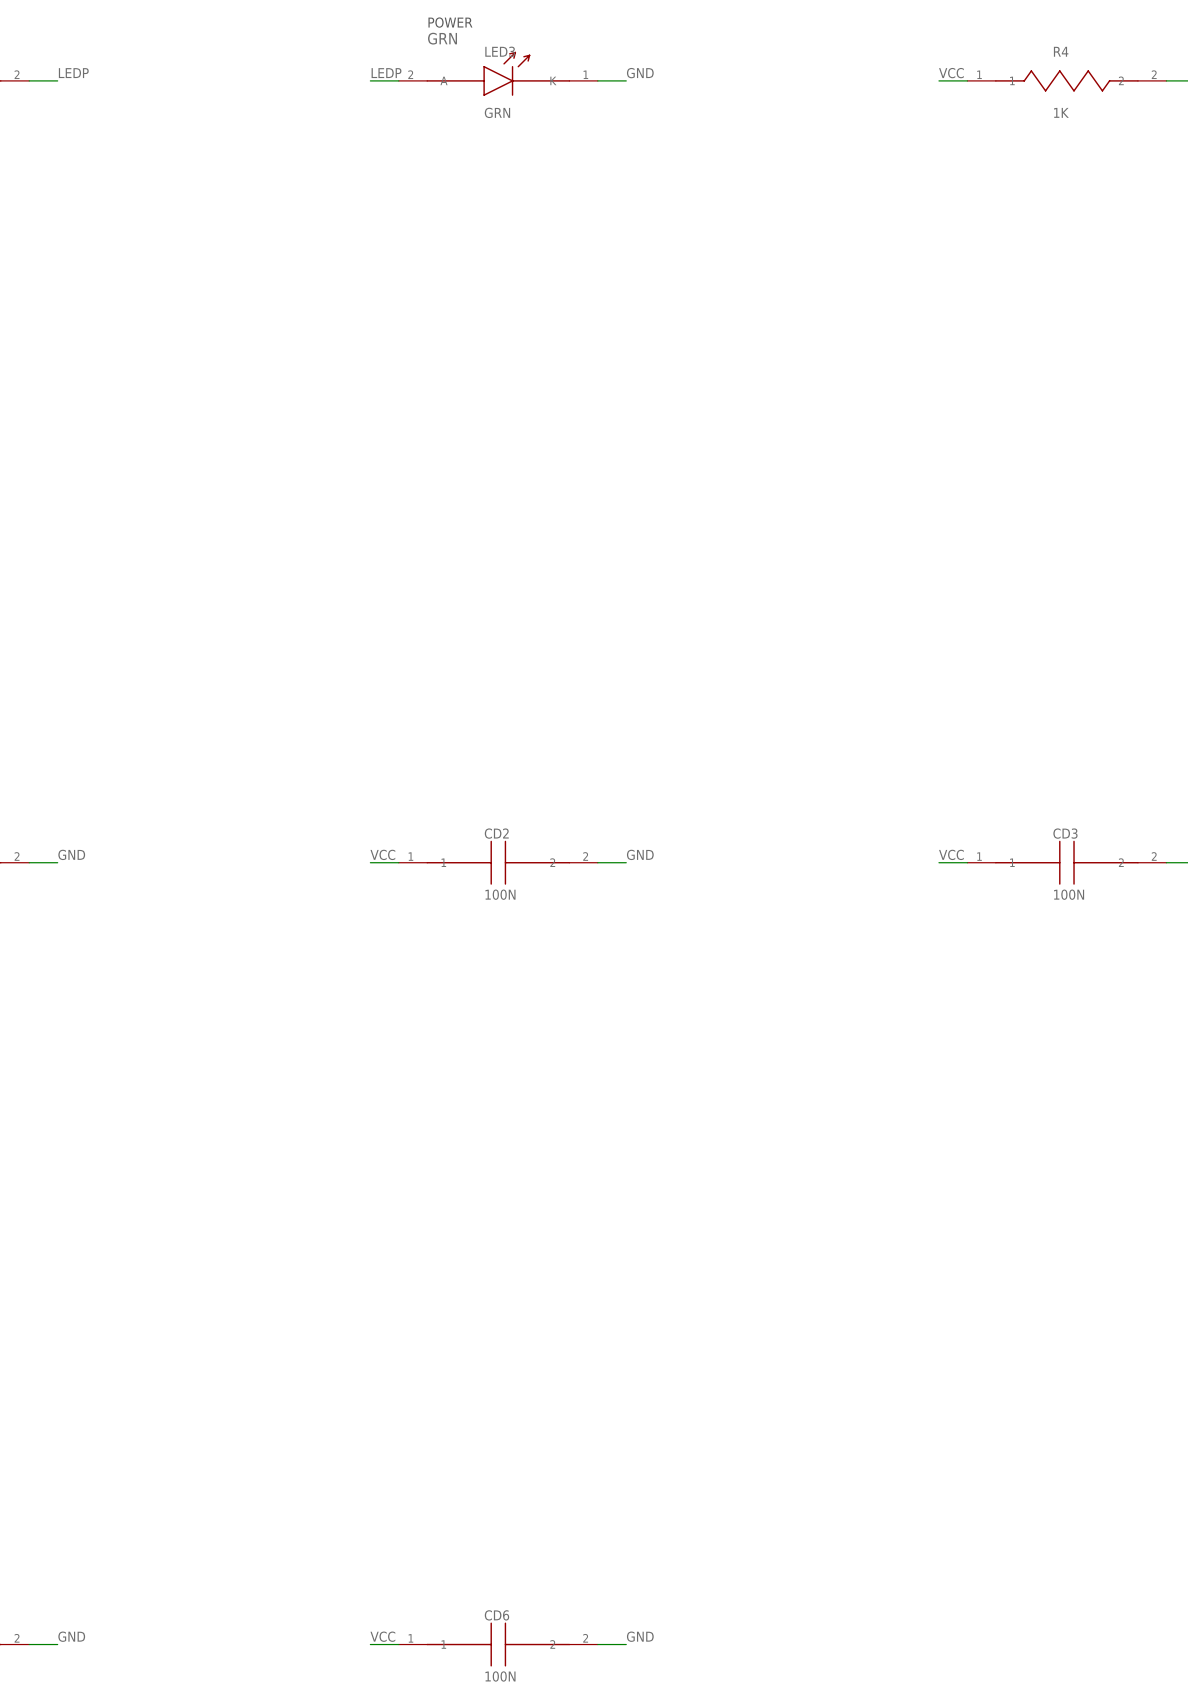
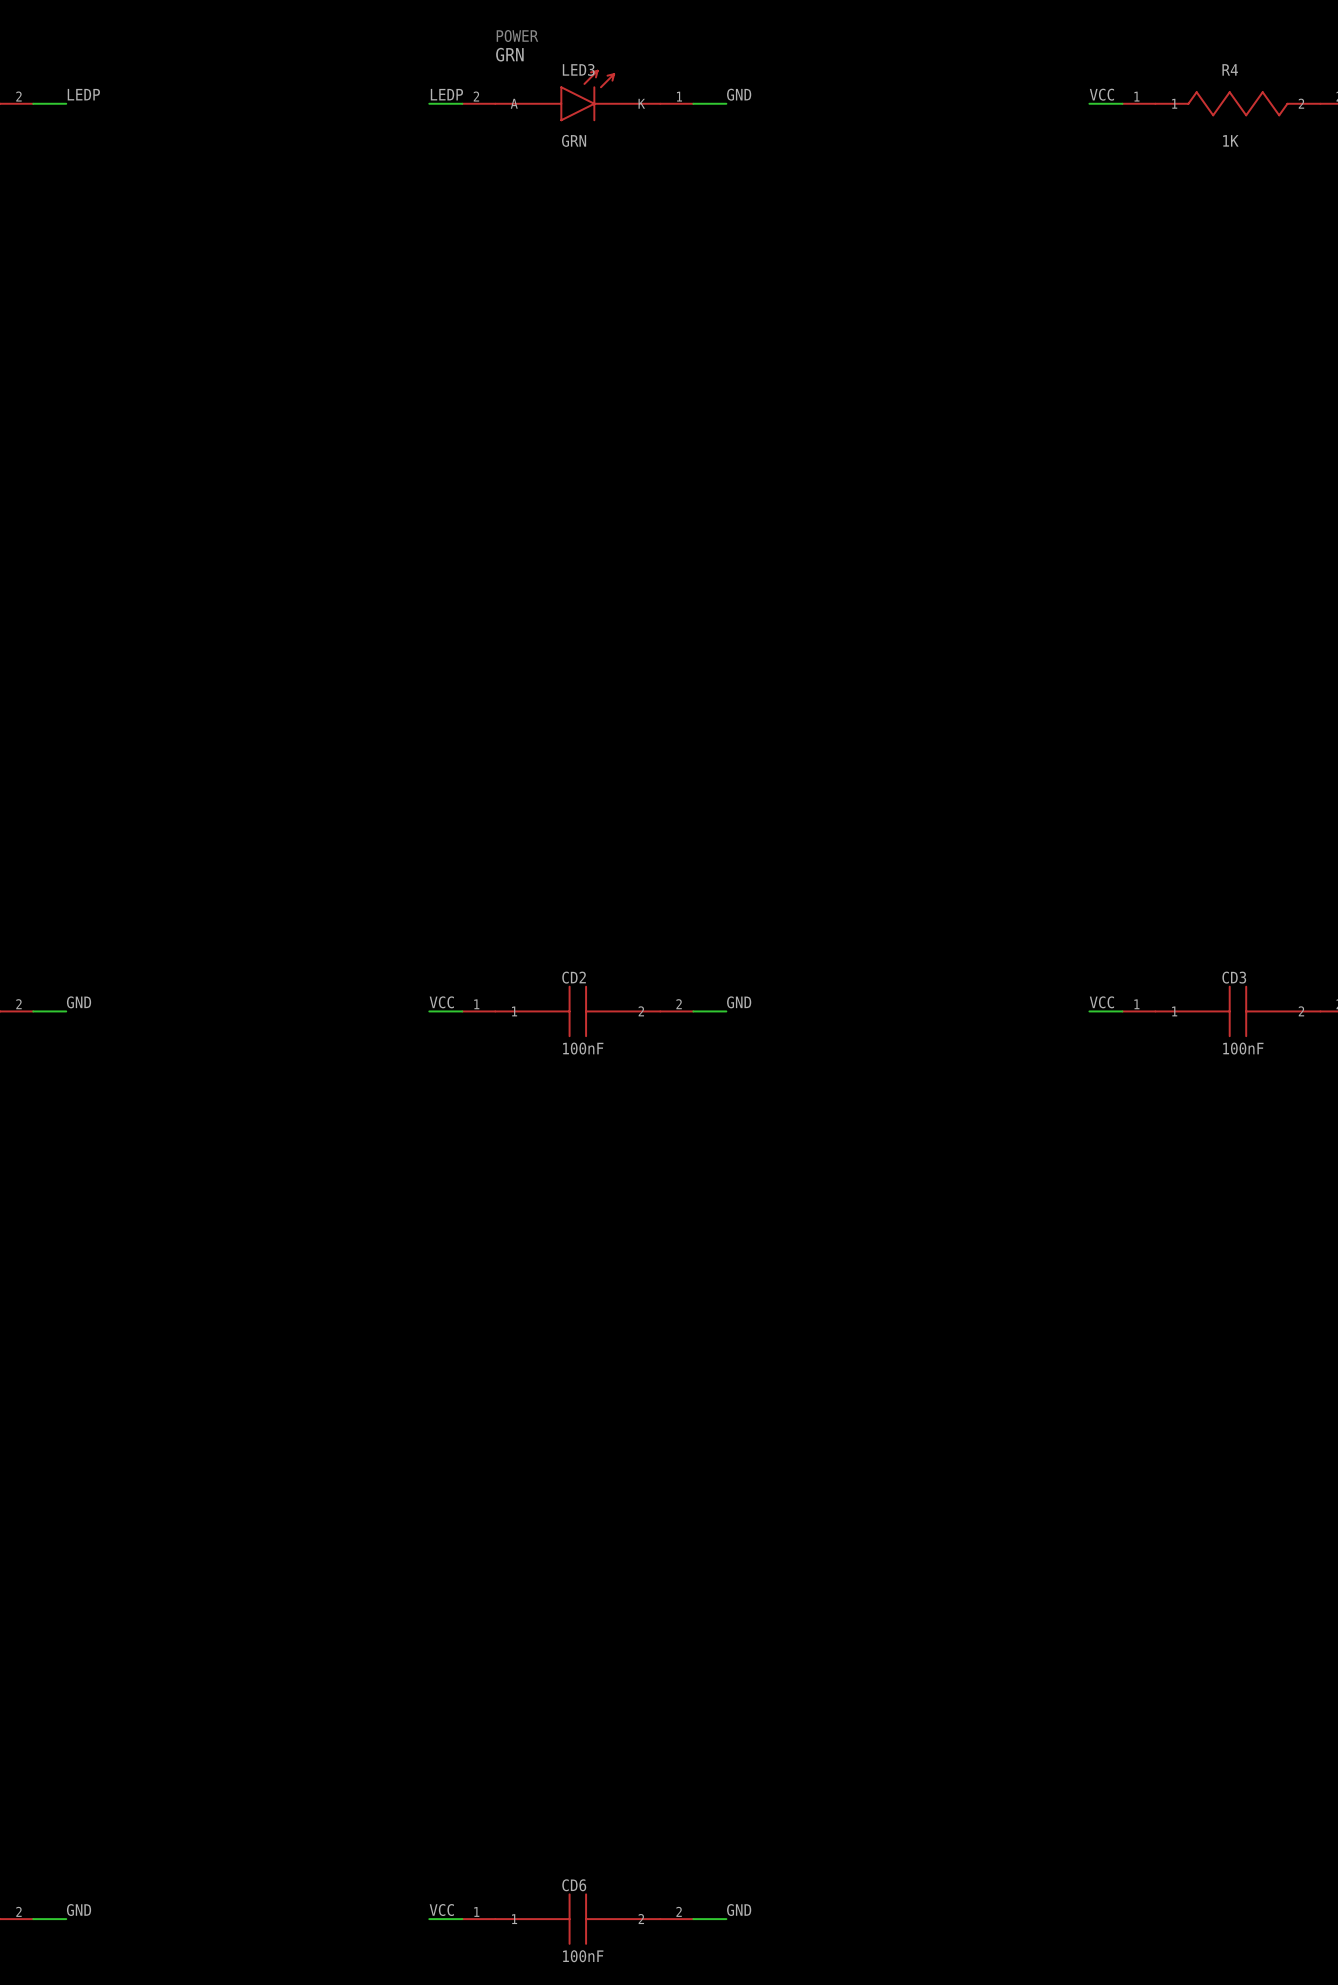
CD2 value: 100N (500, 894) -> 100nF (583, 1048)
CD3 value: 100N (1069, 894) -> 100nF (1243, 1048)
CD6 value: 100N (500, 1676) -> 100nF (583, 1956)

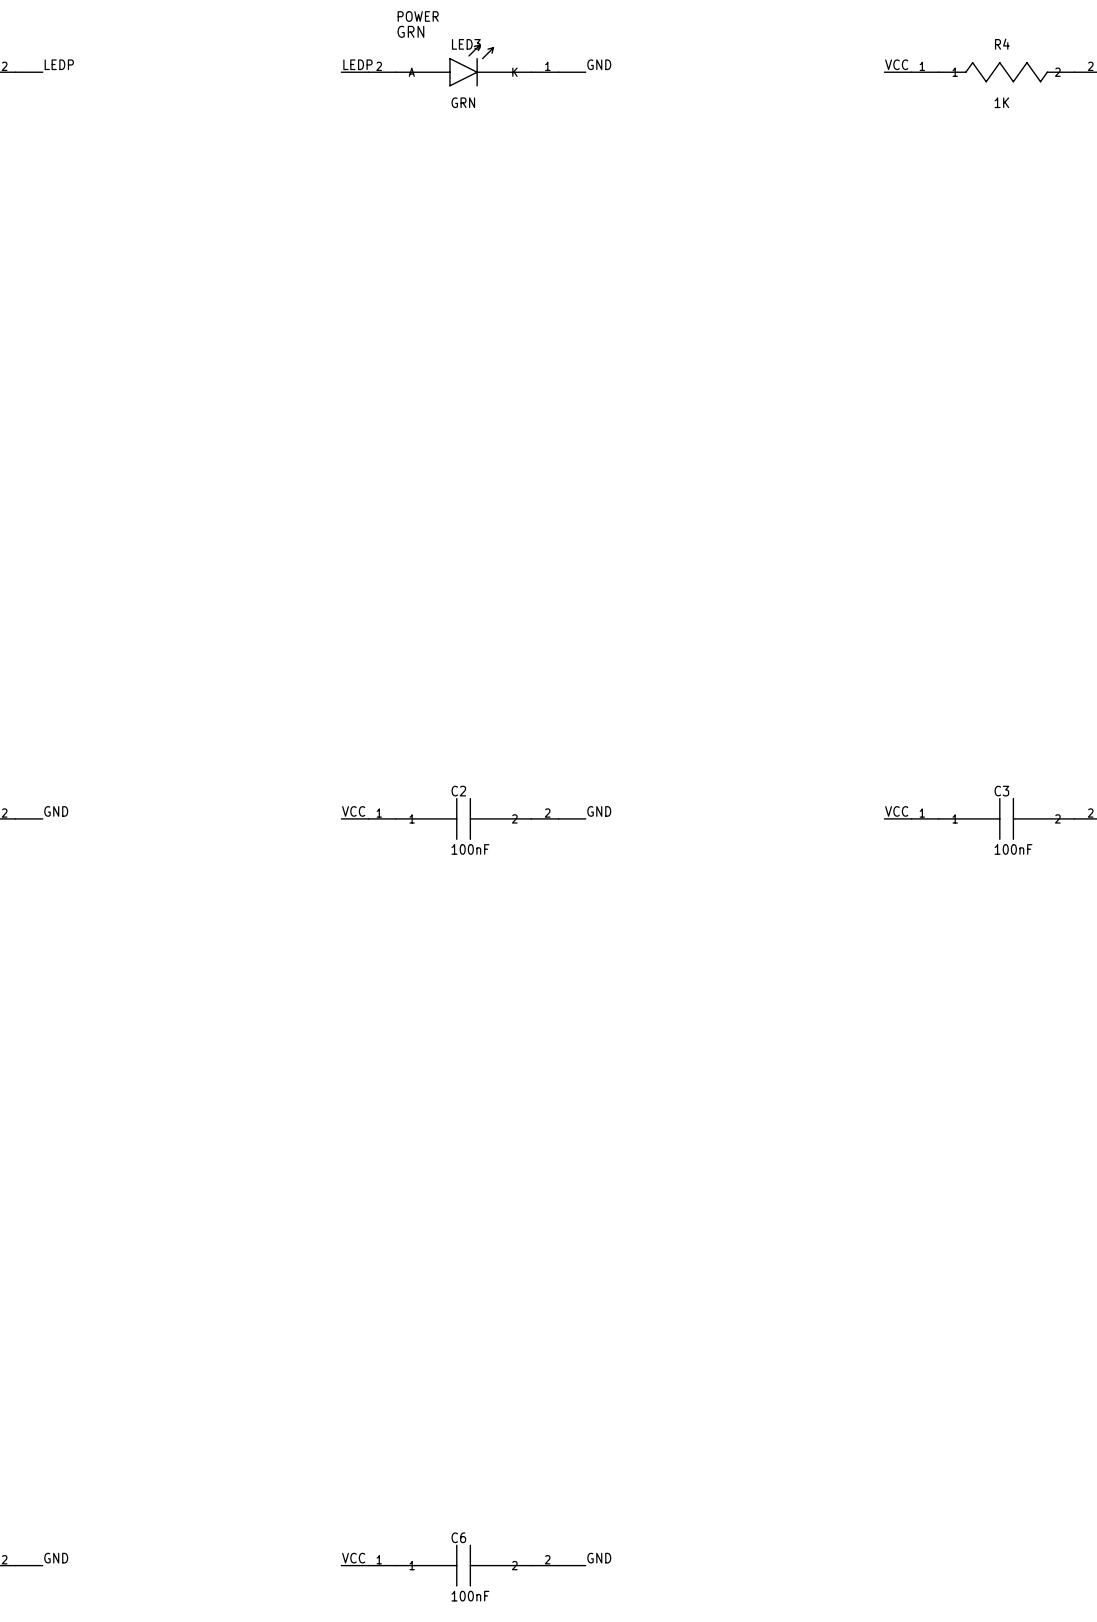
CD2 name: CD2 (574, 977) -> C2 (458, 791)
CD3 name: CD3 (1234, 977) -> C3 (1001, 791)
CD6 name: CD6 (574, 1885) -> C6 (458, 1537)

